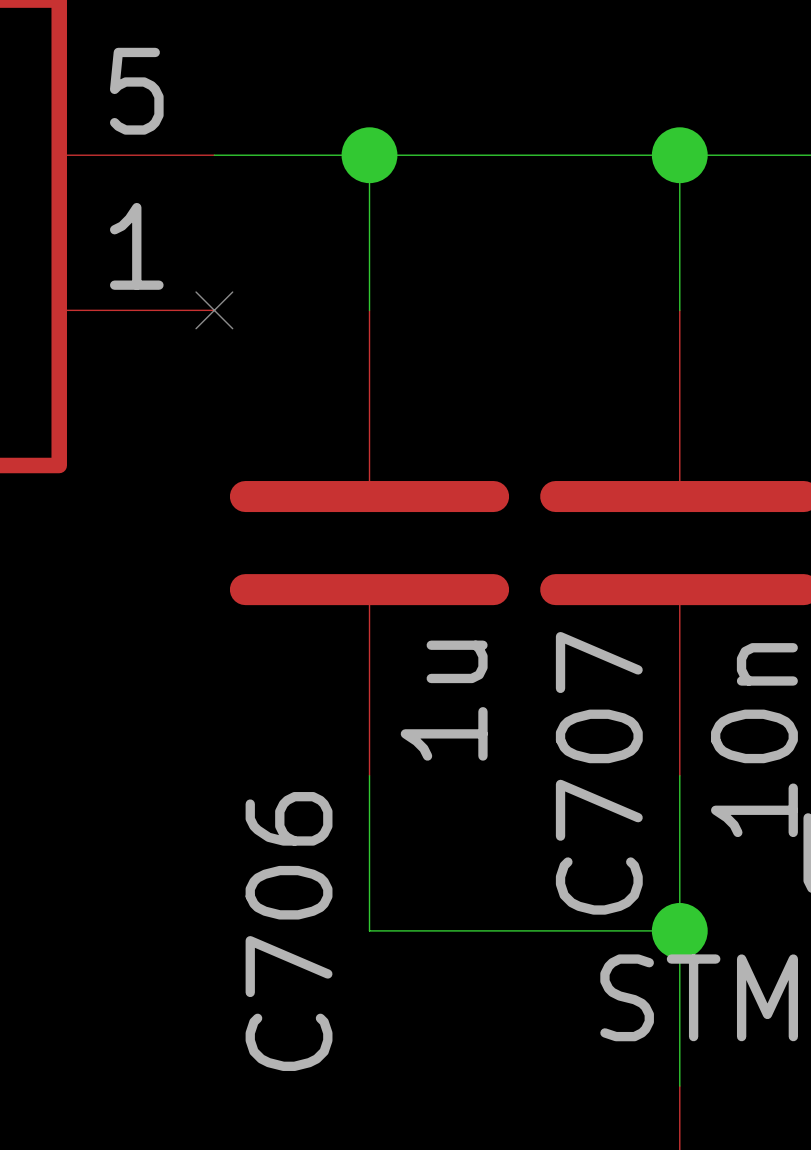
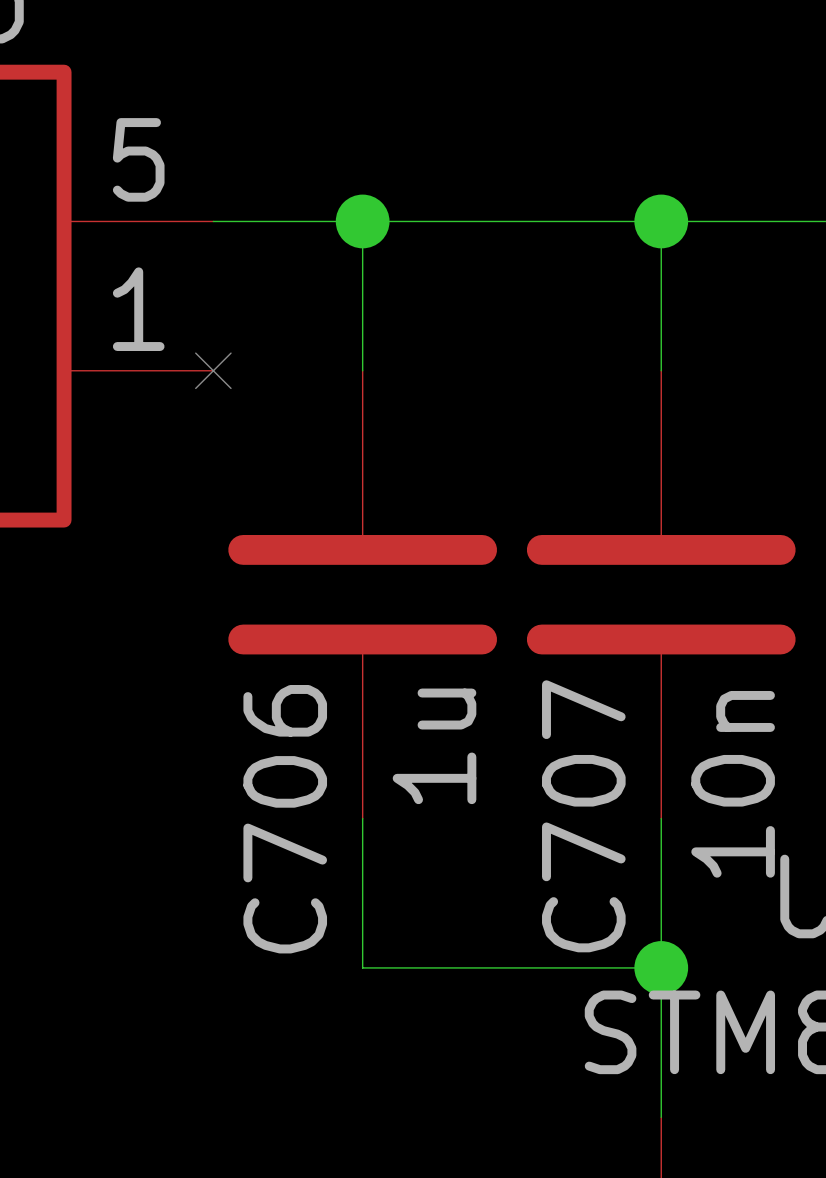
C706 name position: C706 (289, 931) -> C706 (285, 819)

